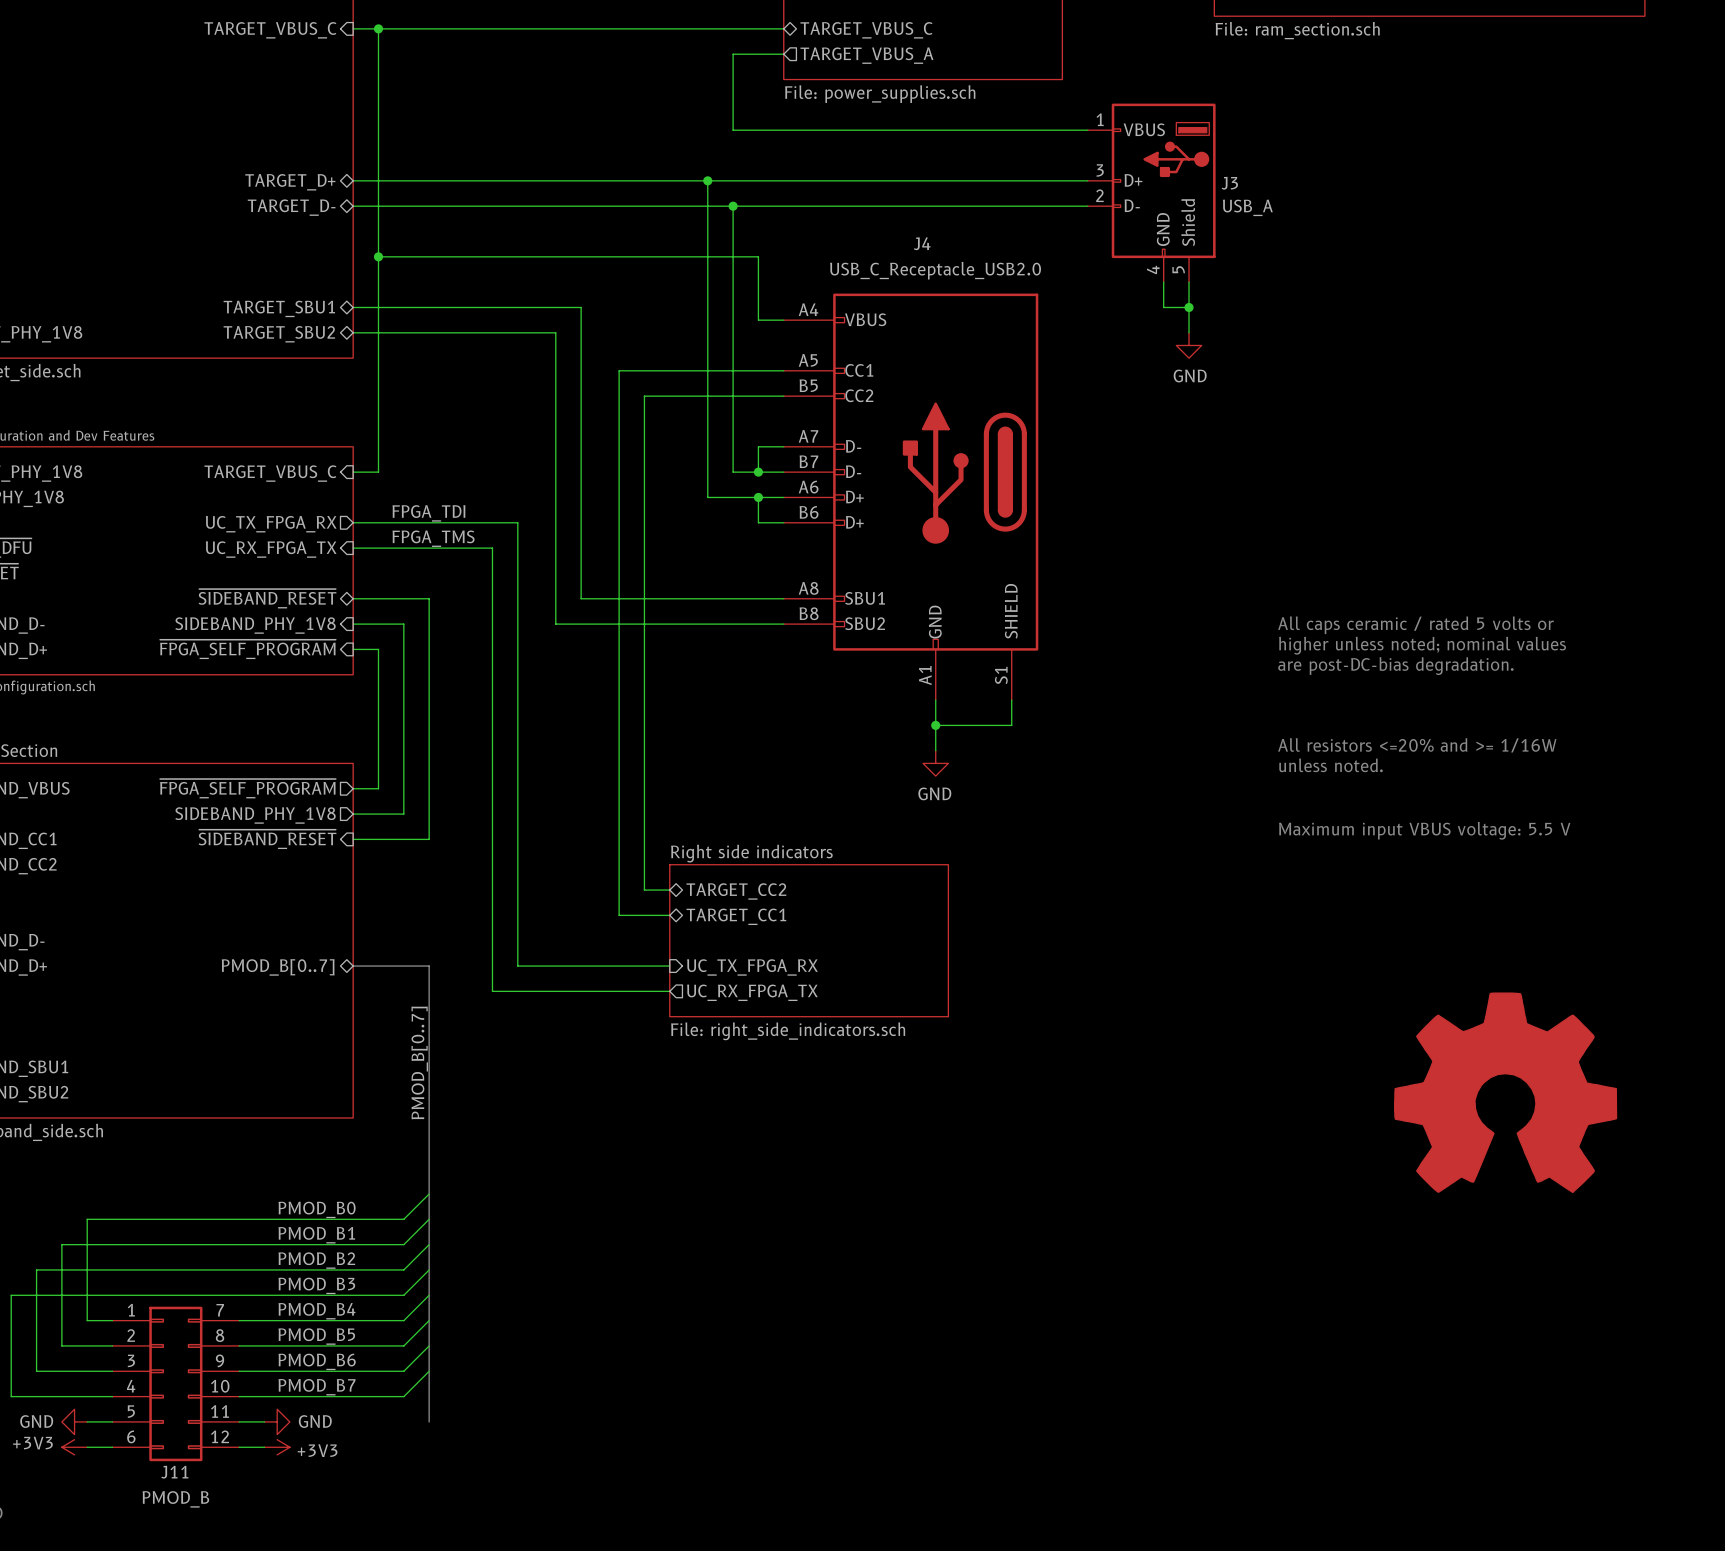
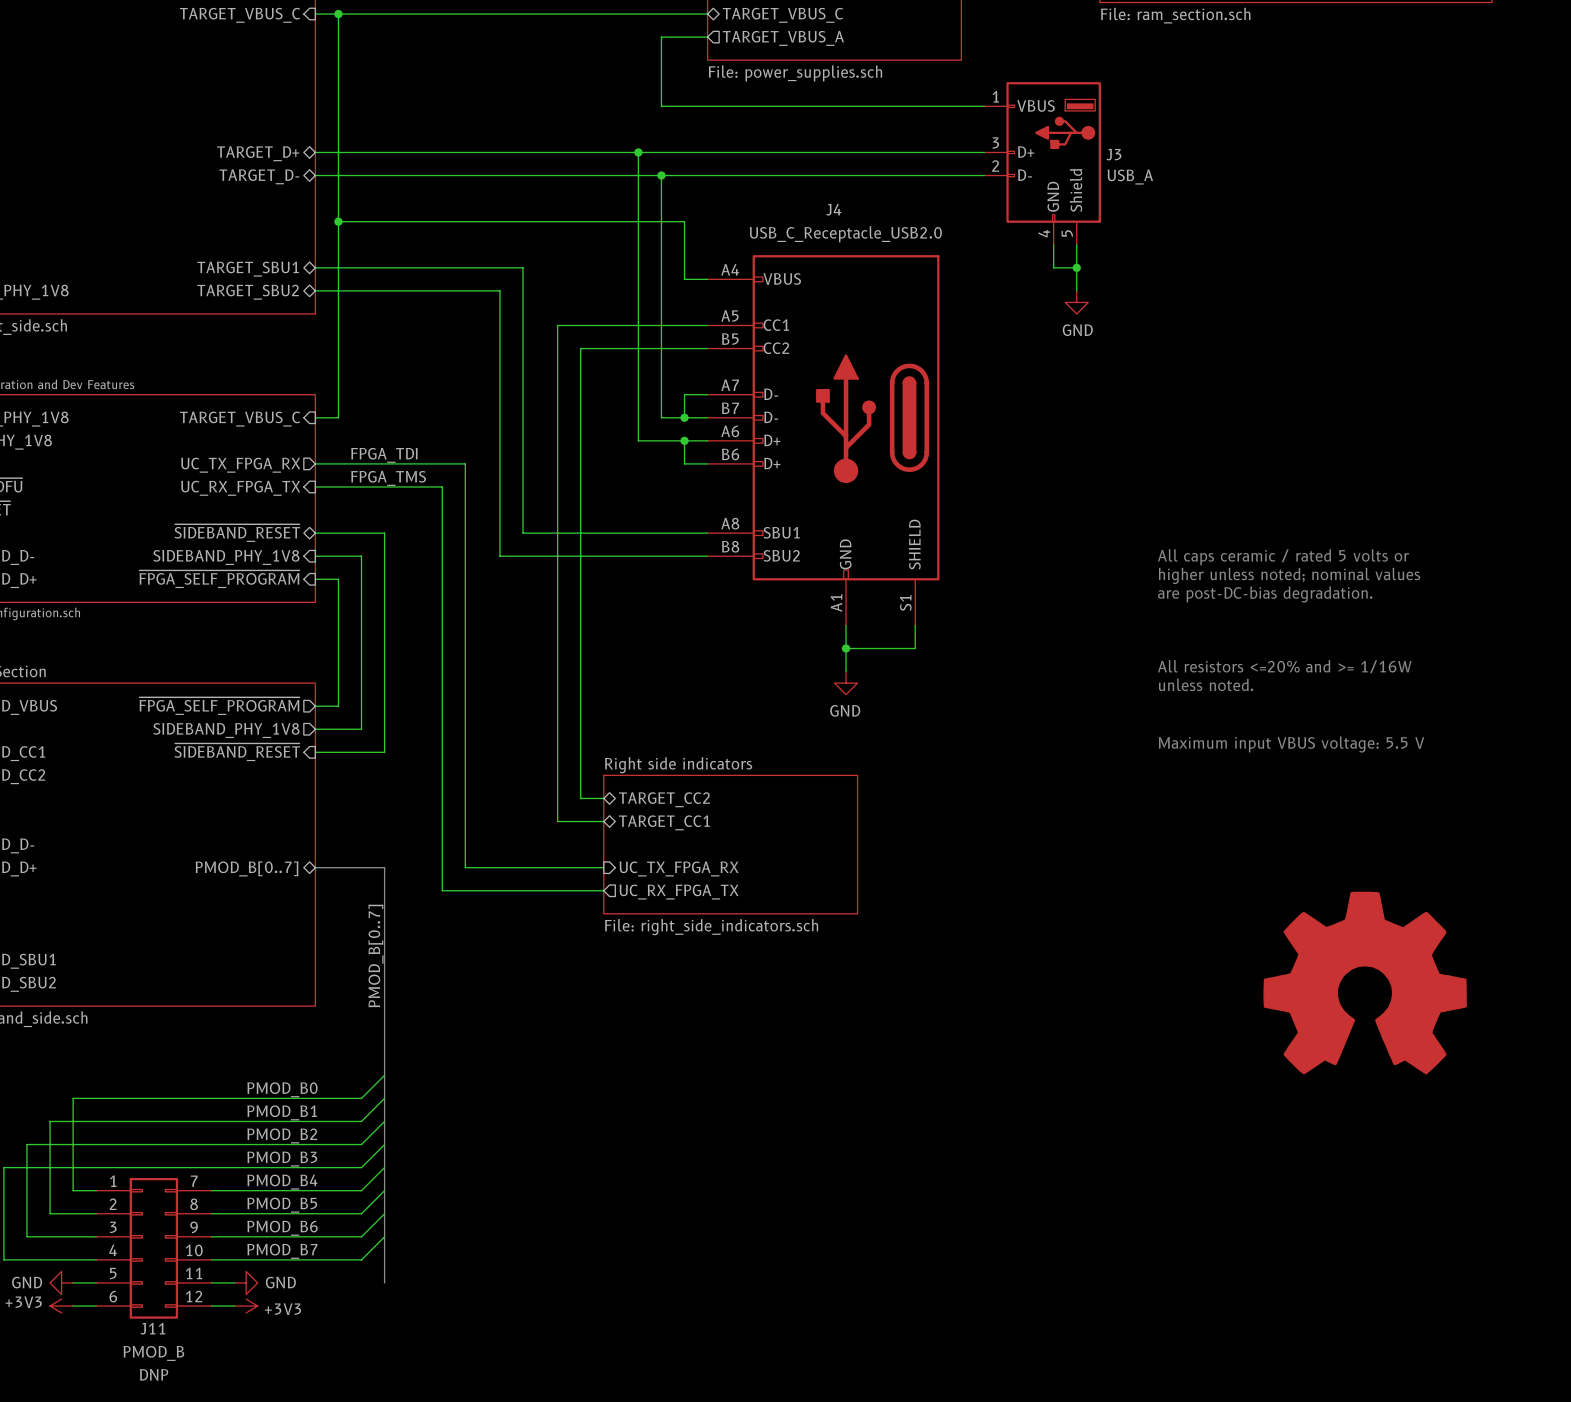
J11 text: none -> DNP (154, 1374)

